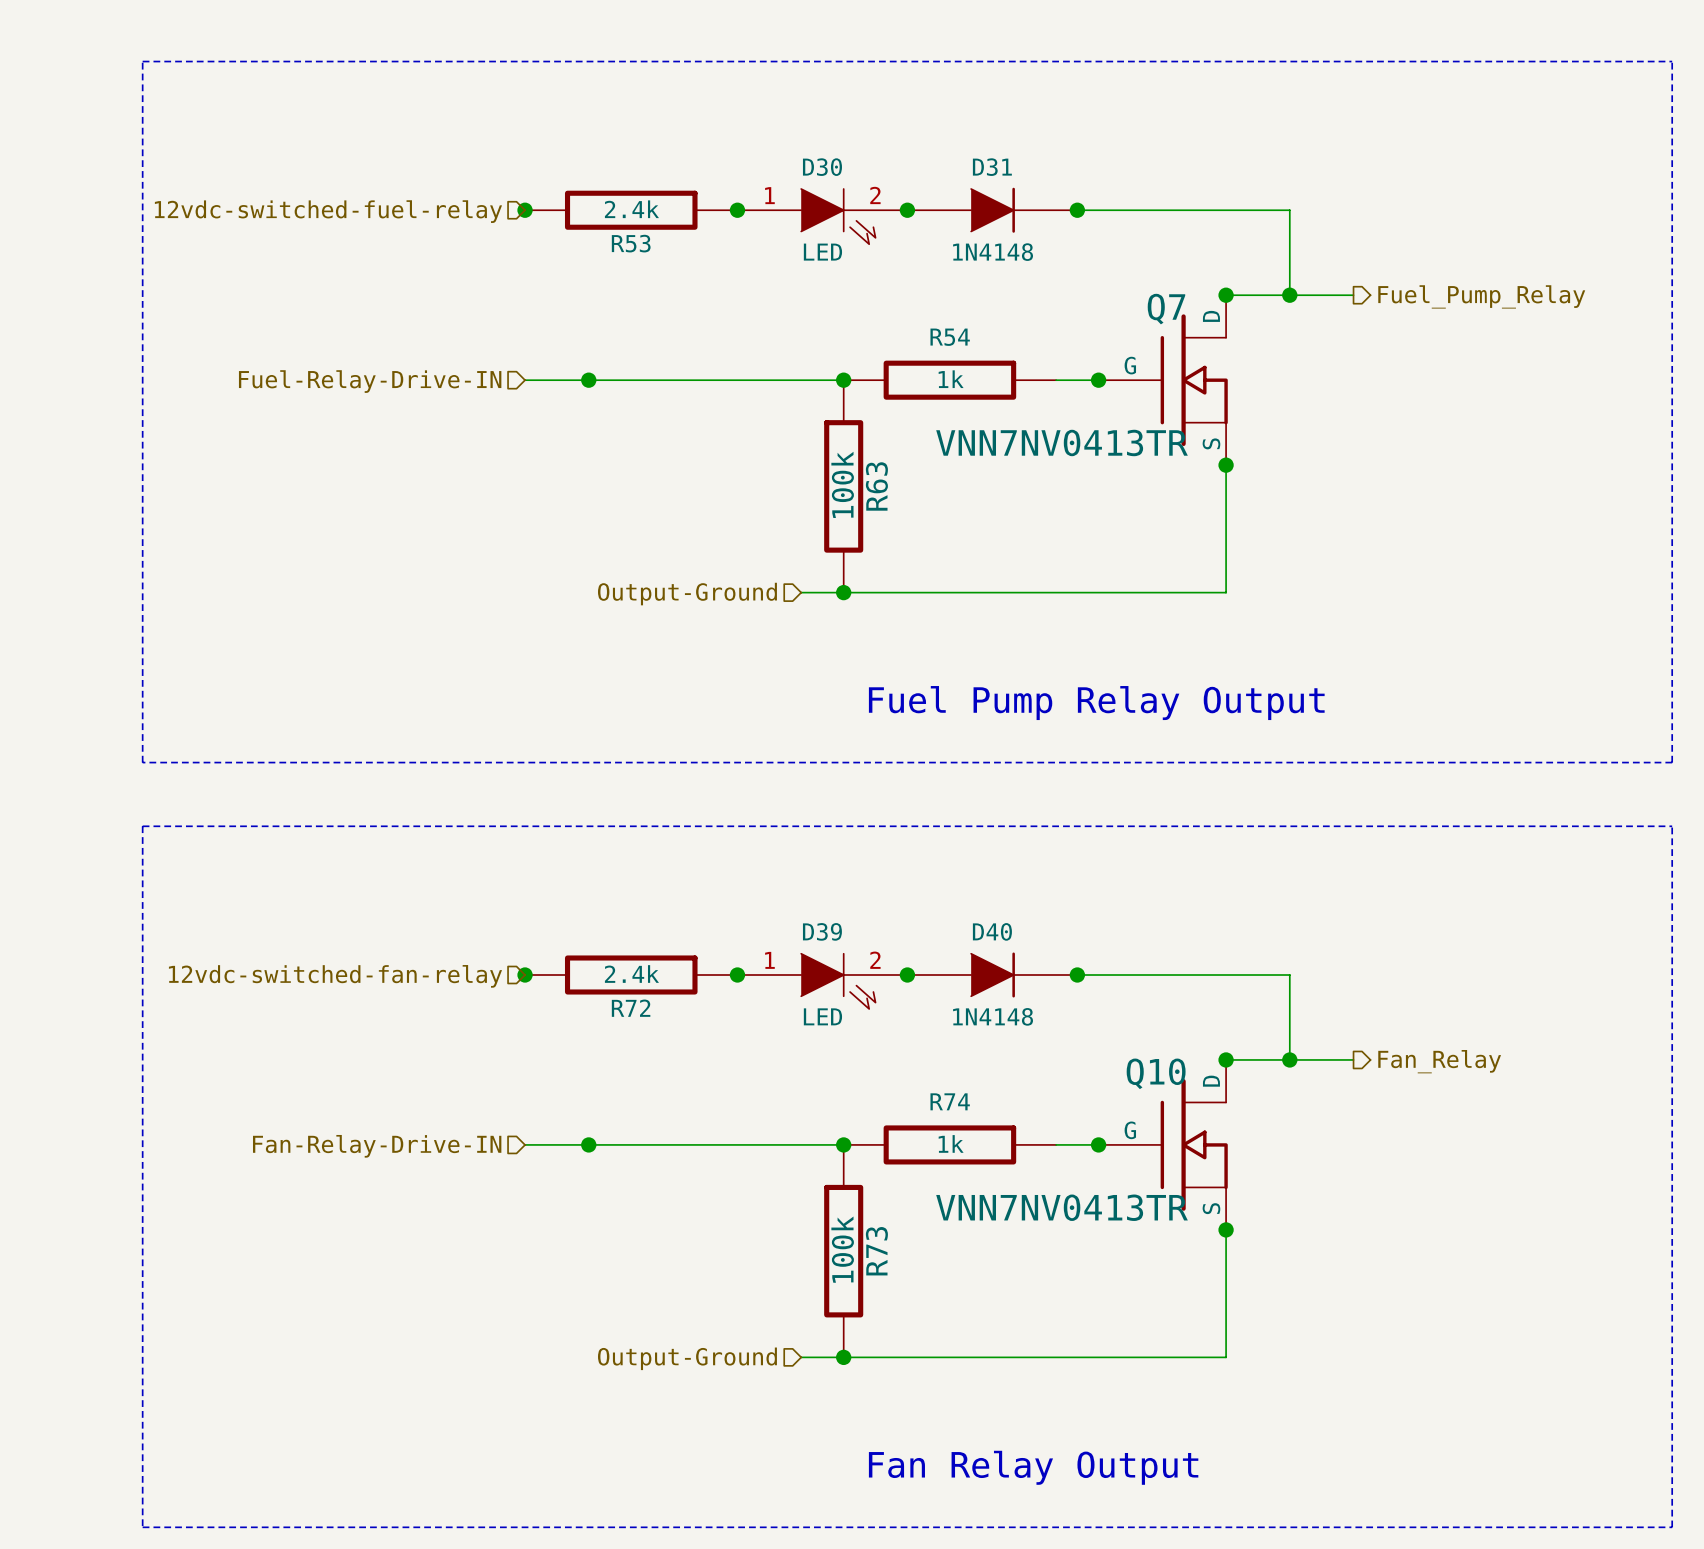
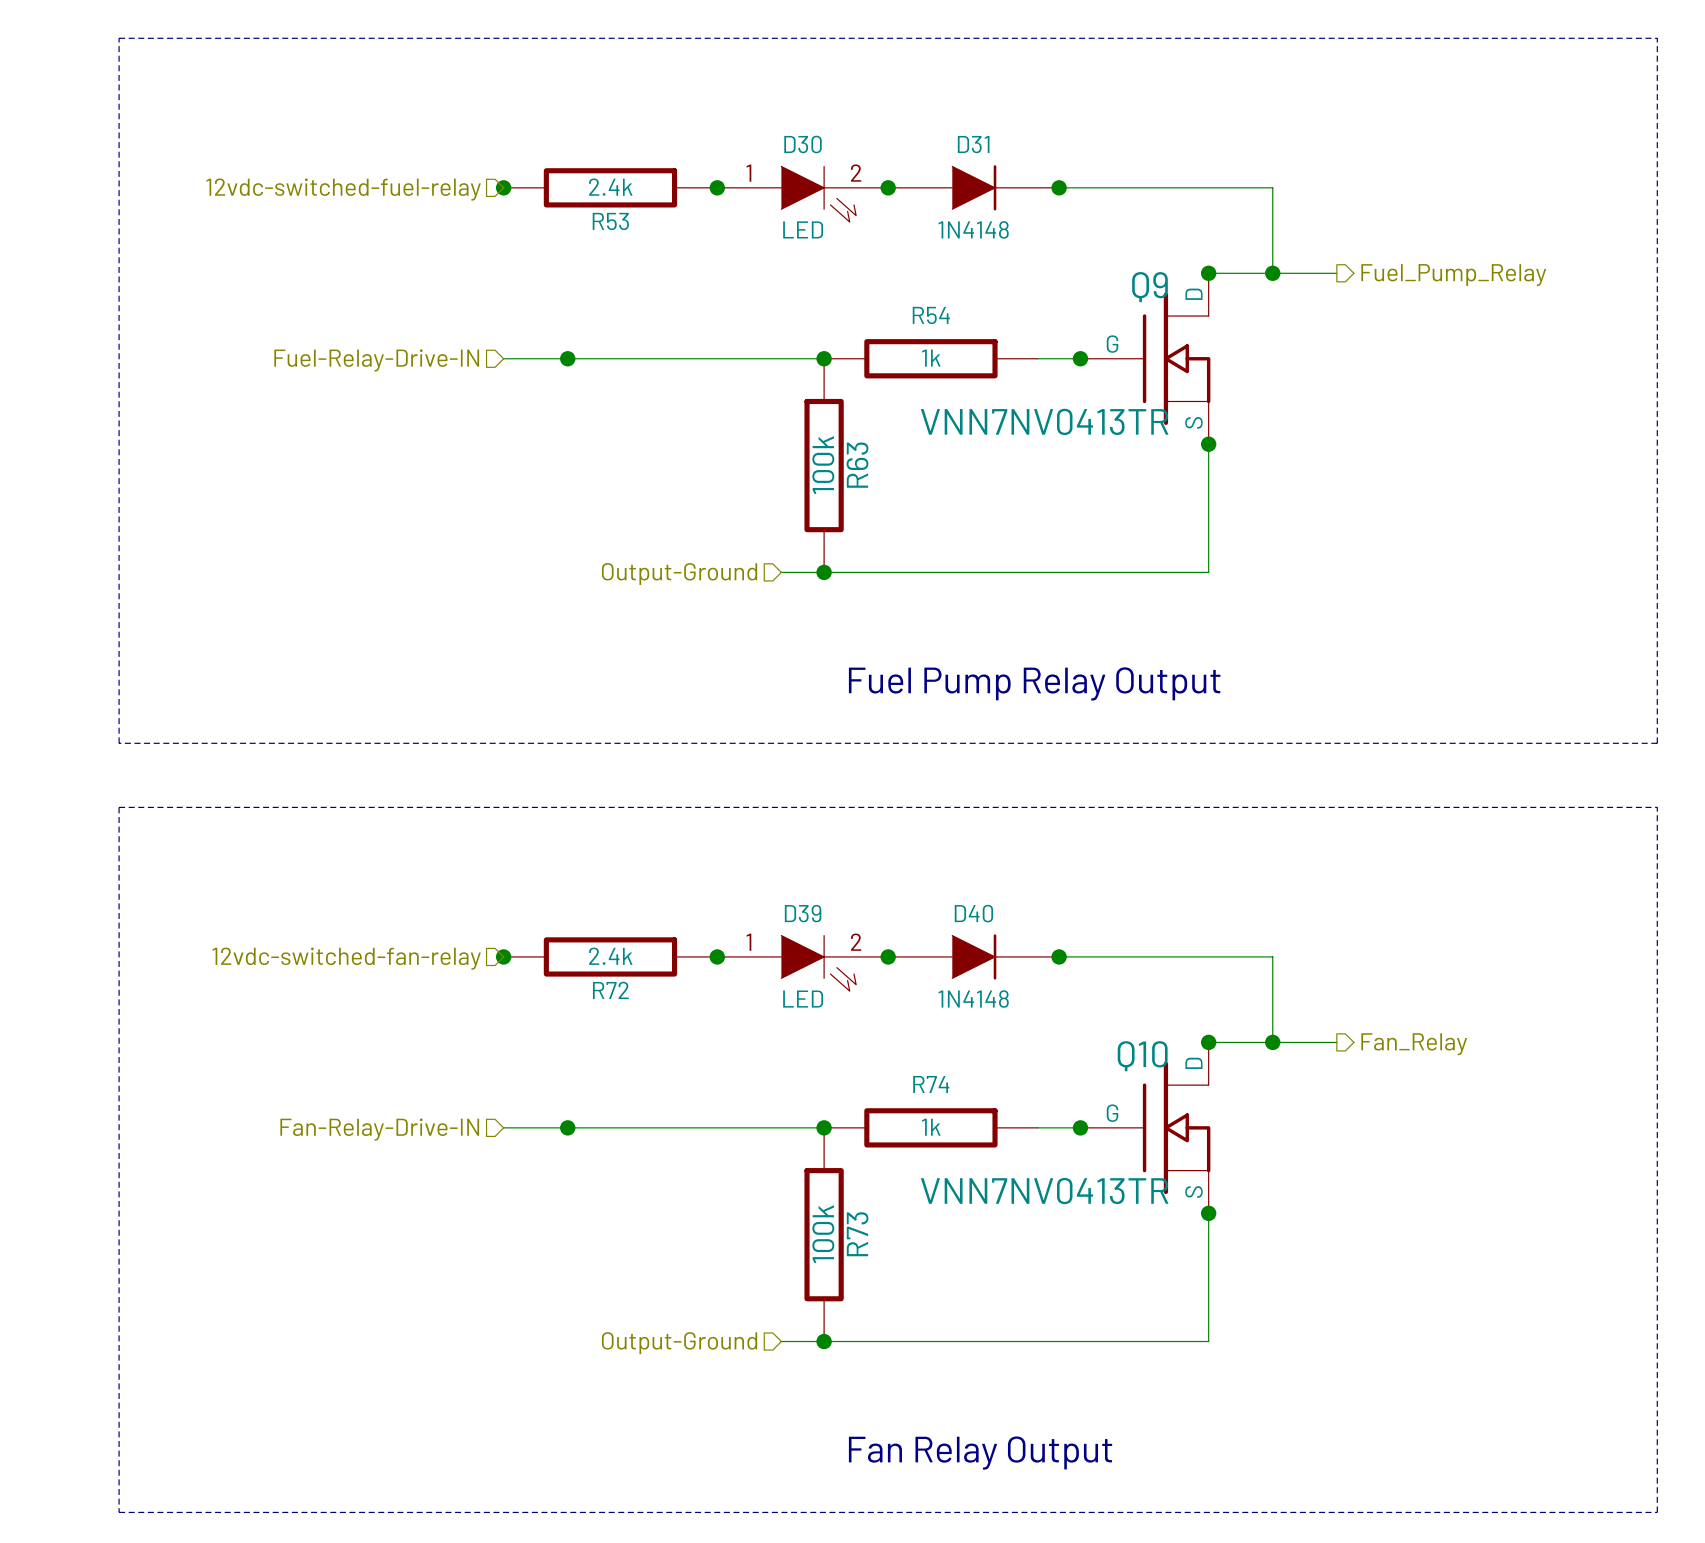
Q7 name: Q7 (1166, 309) -> Q9 (1149, 287)

